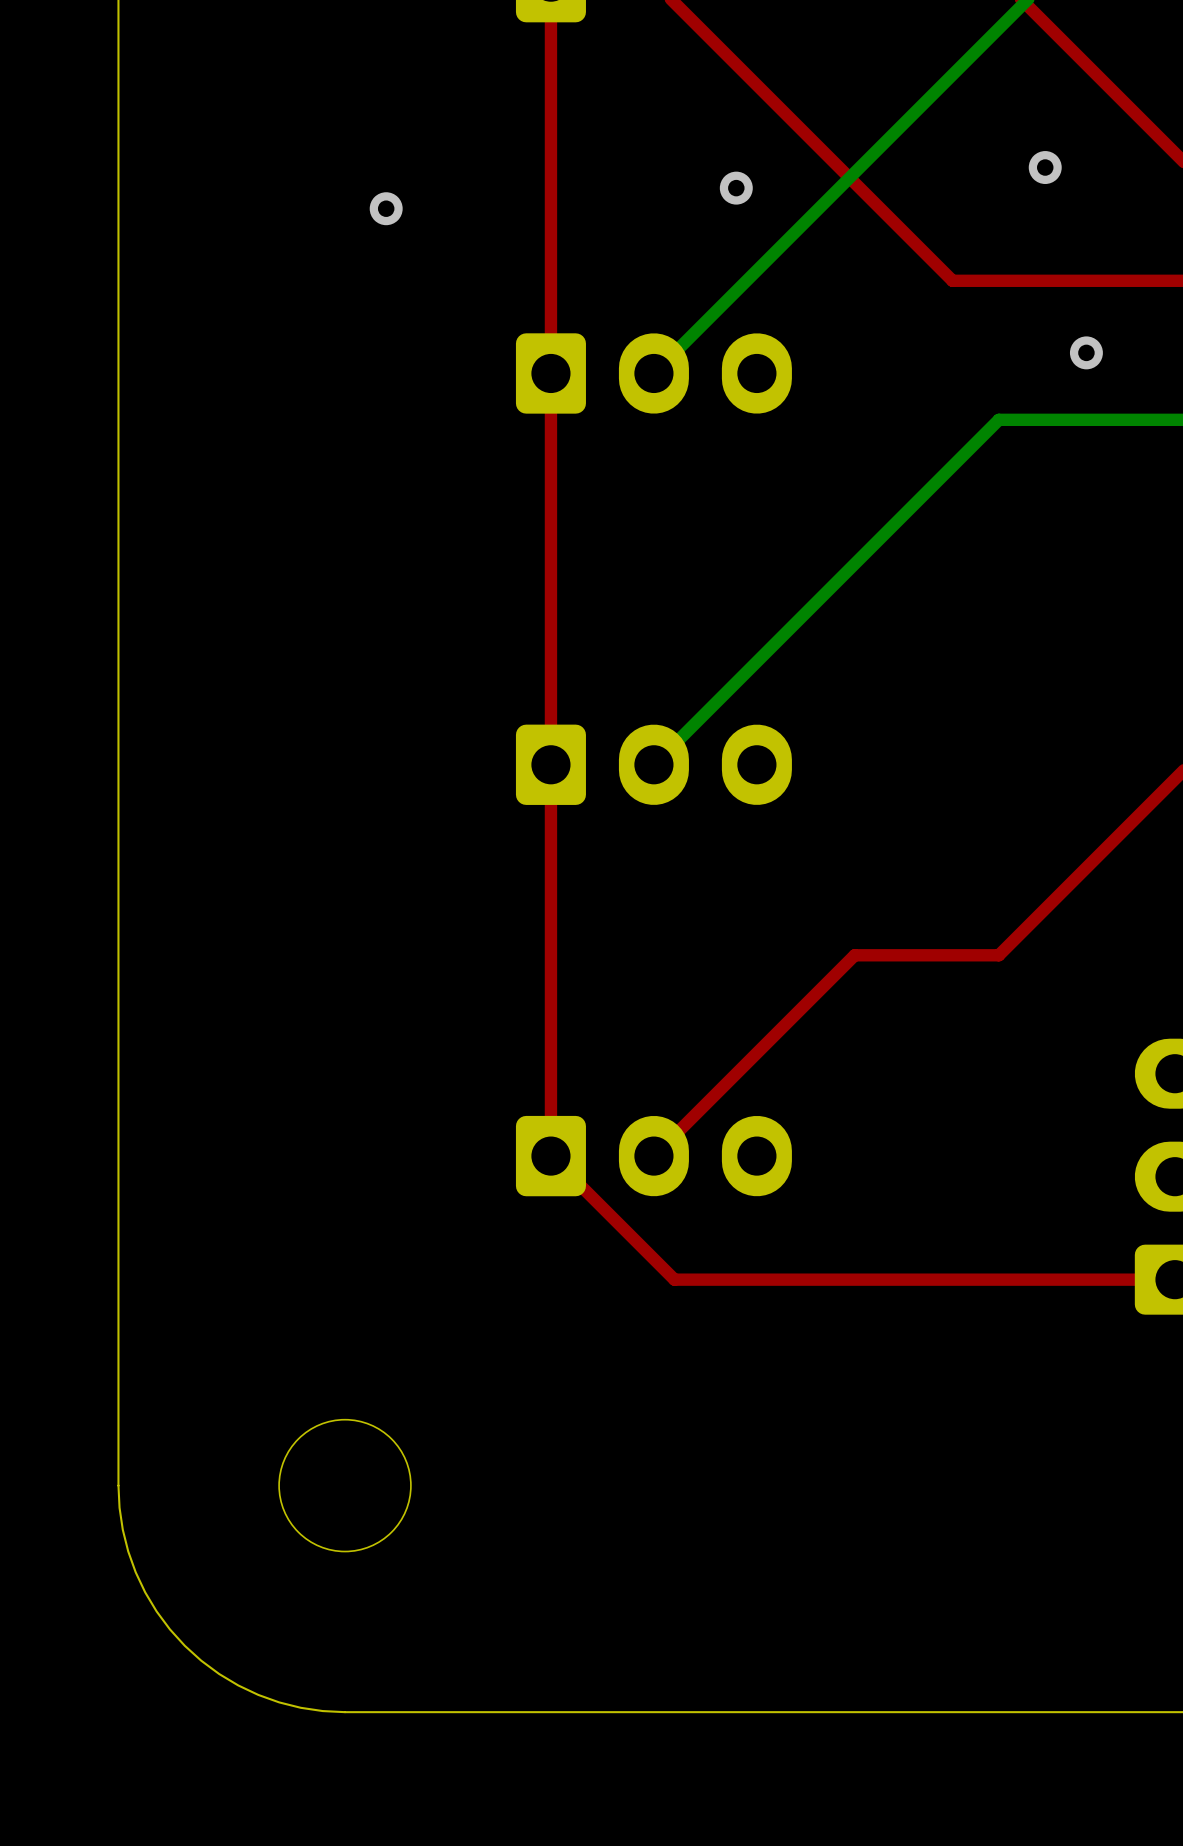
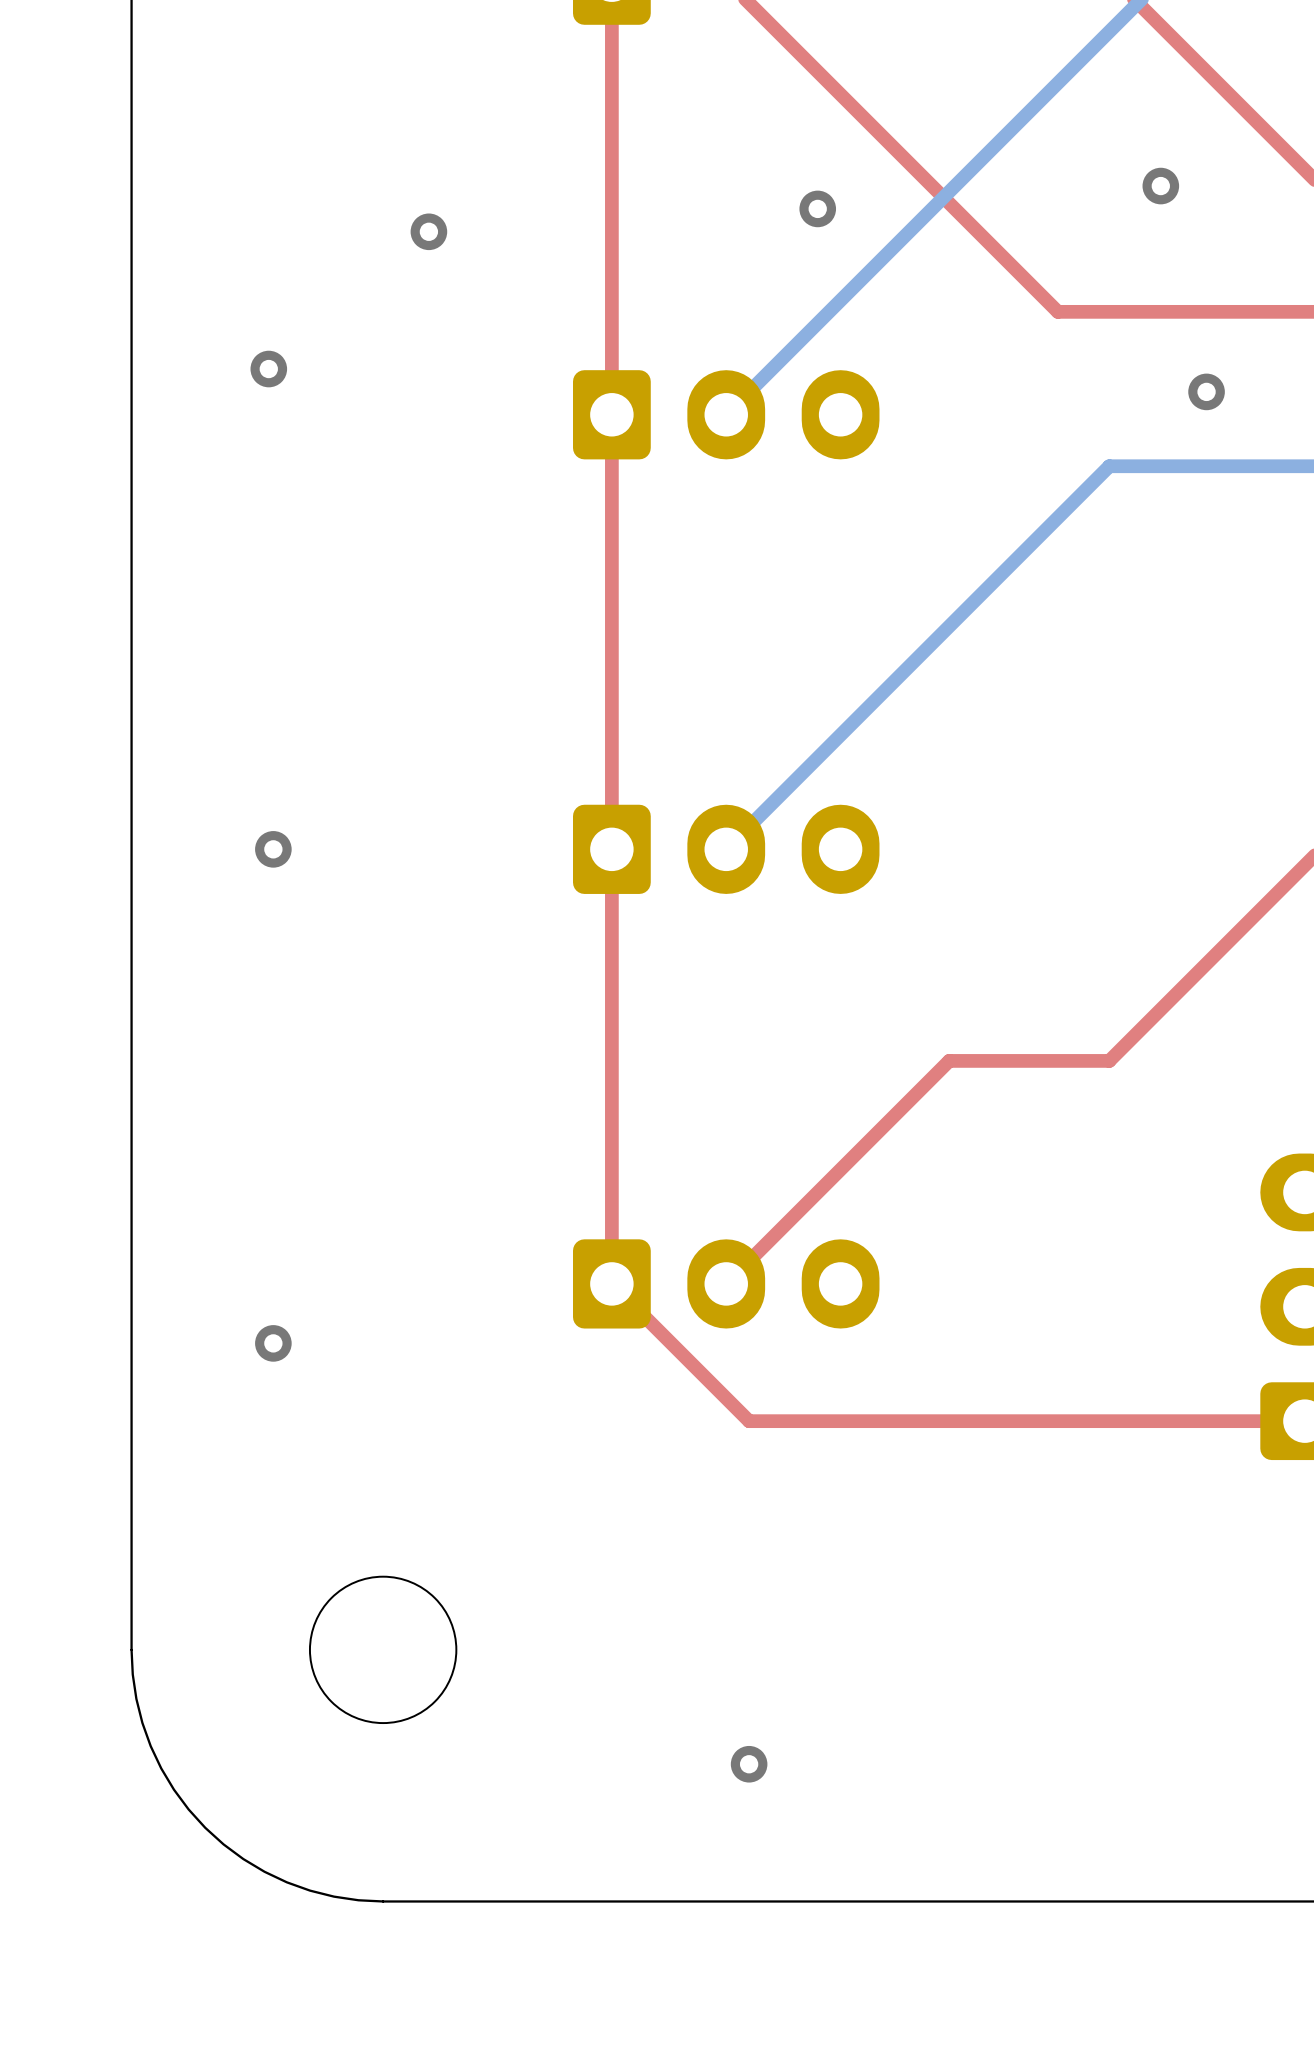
via: none -> (268, 369)
via: none -> (273, 849)
via: none -> (273, 1343)
via: none -> (749, 1764)

